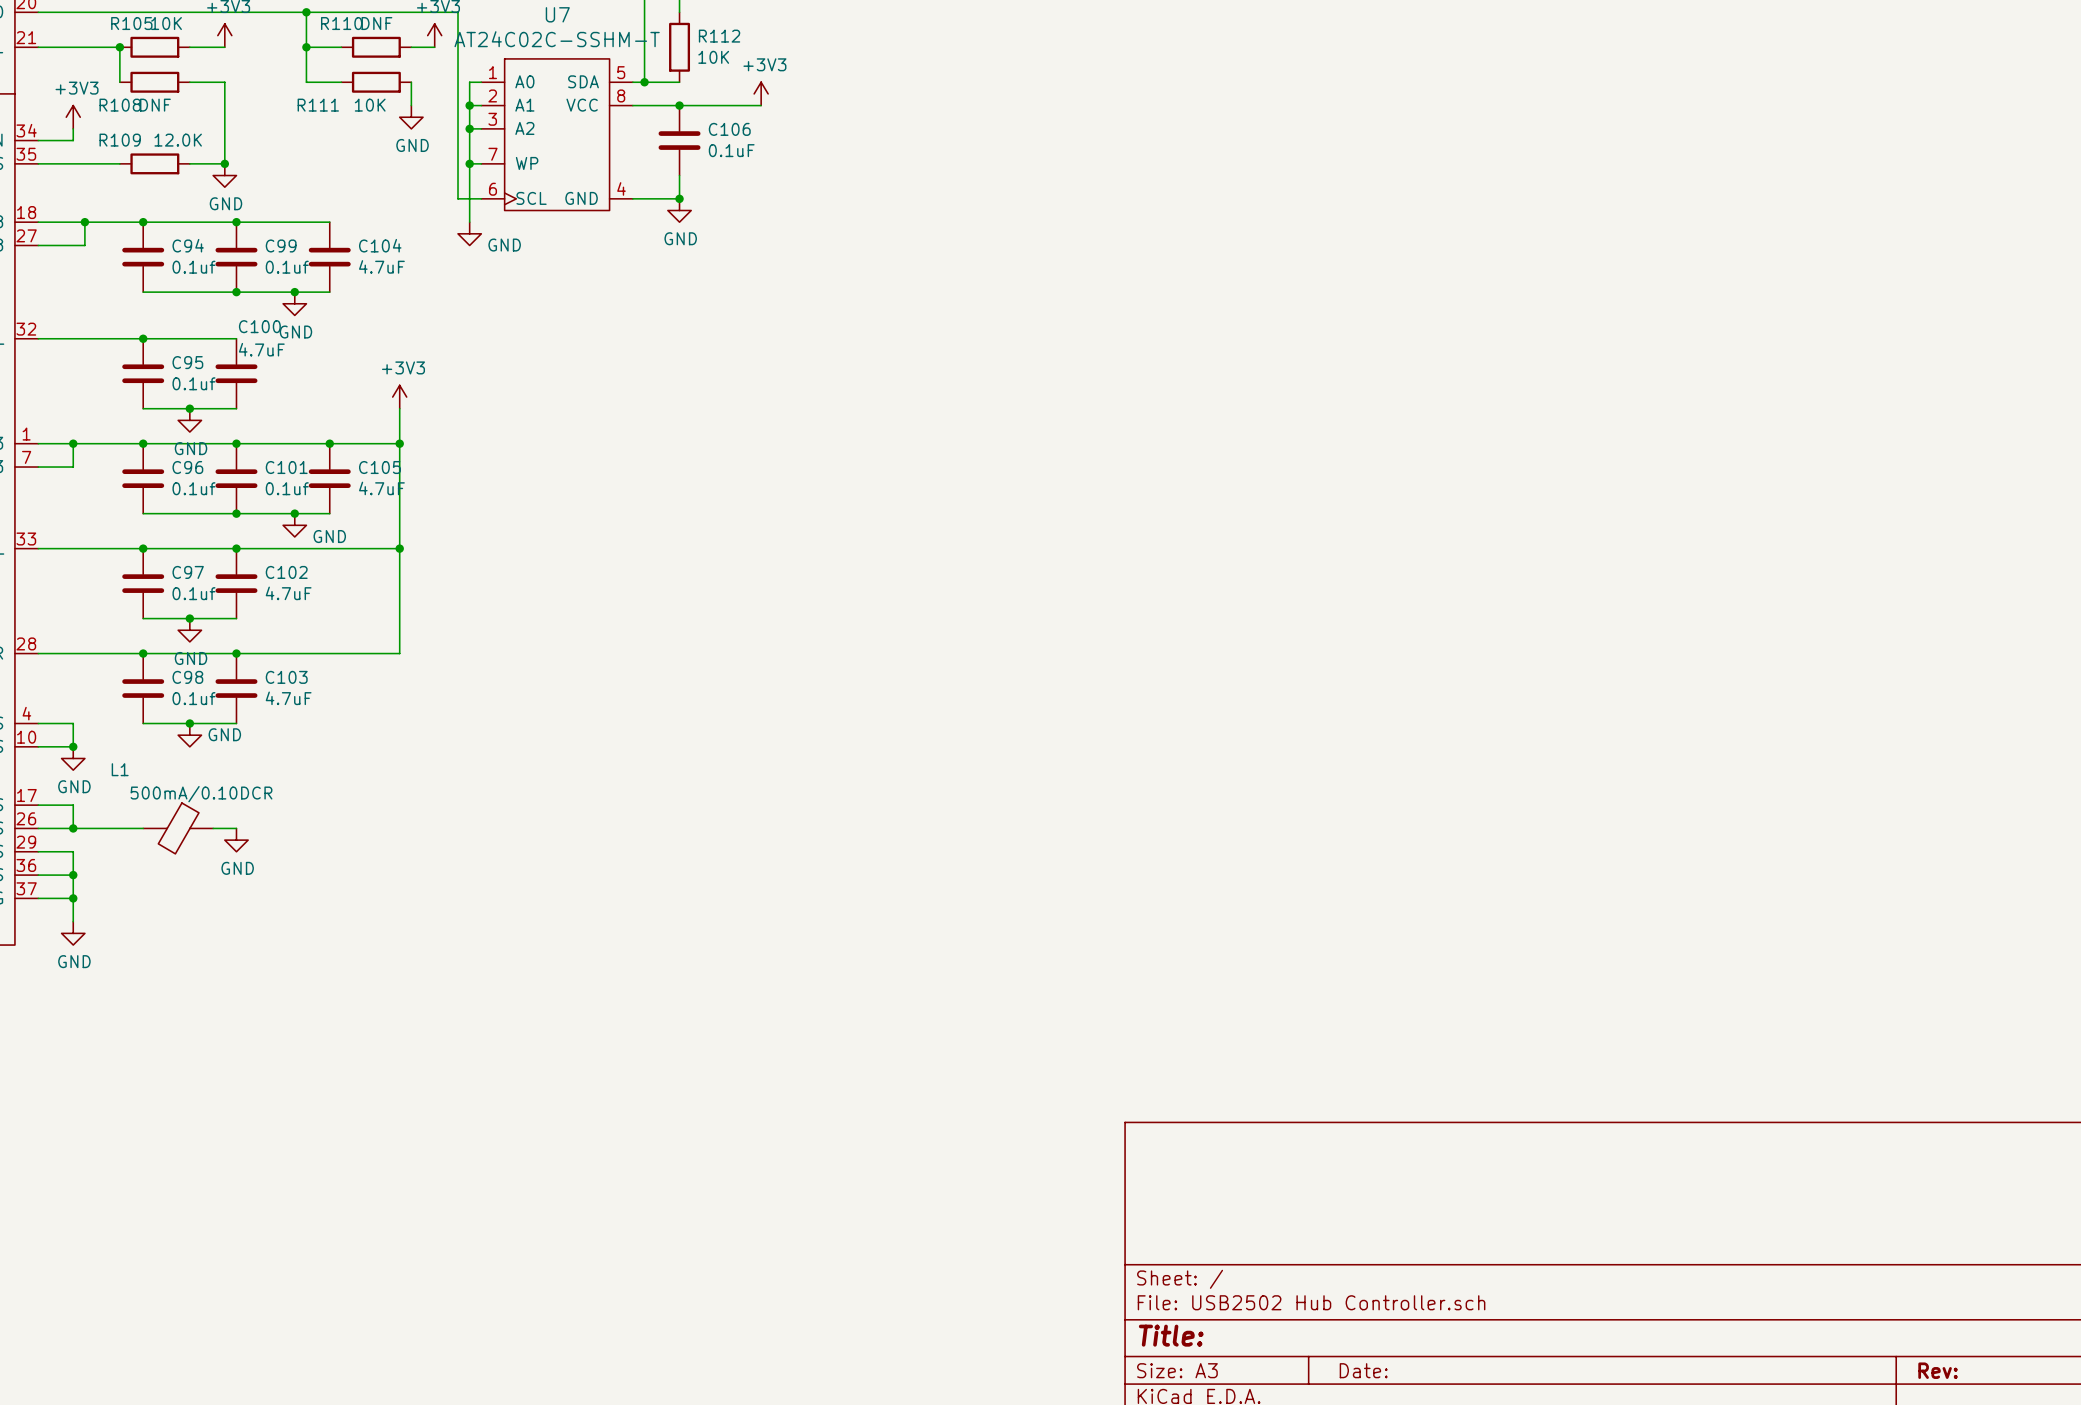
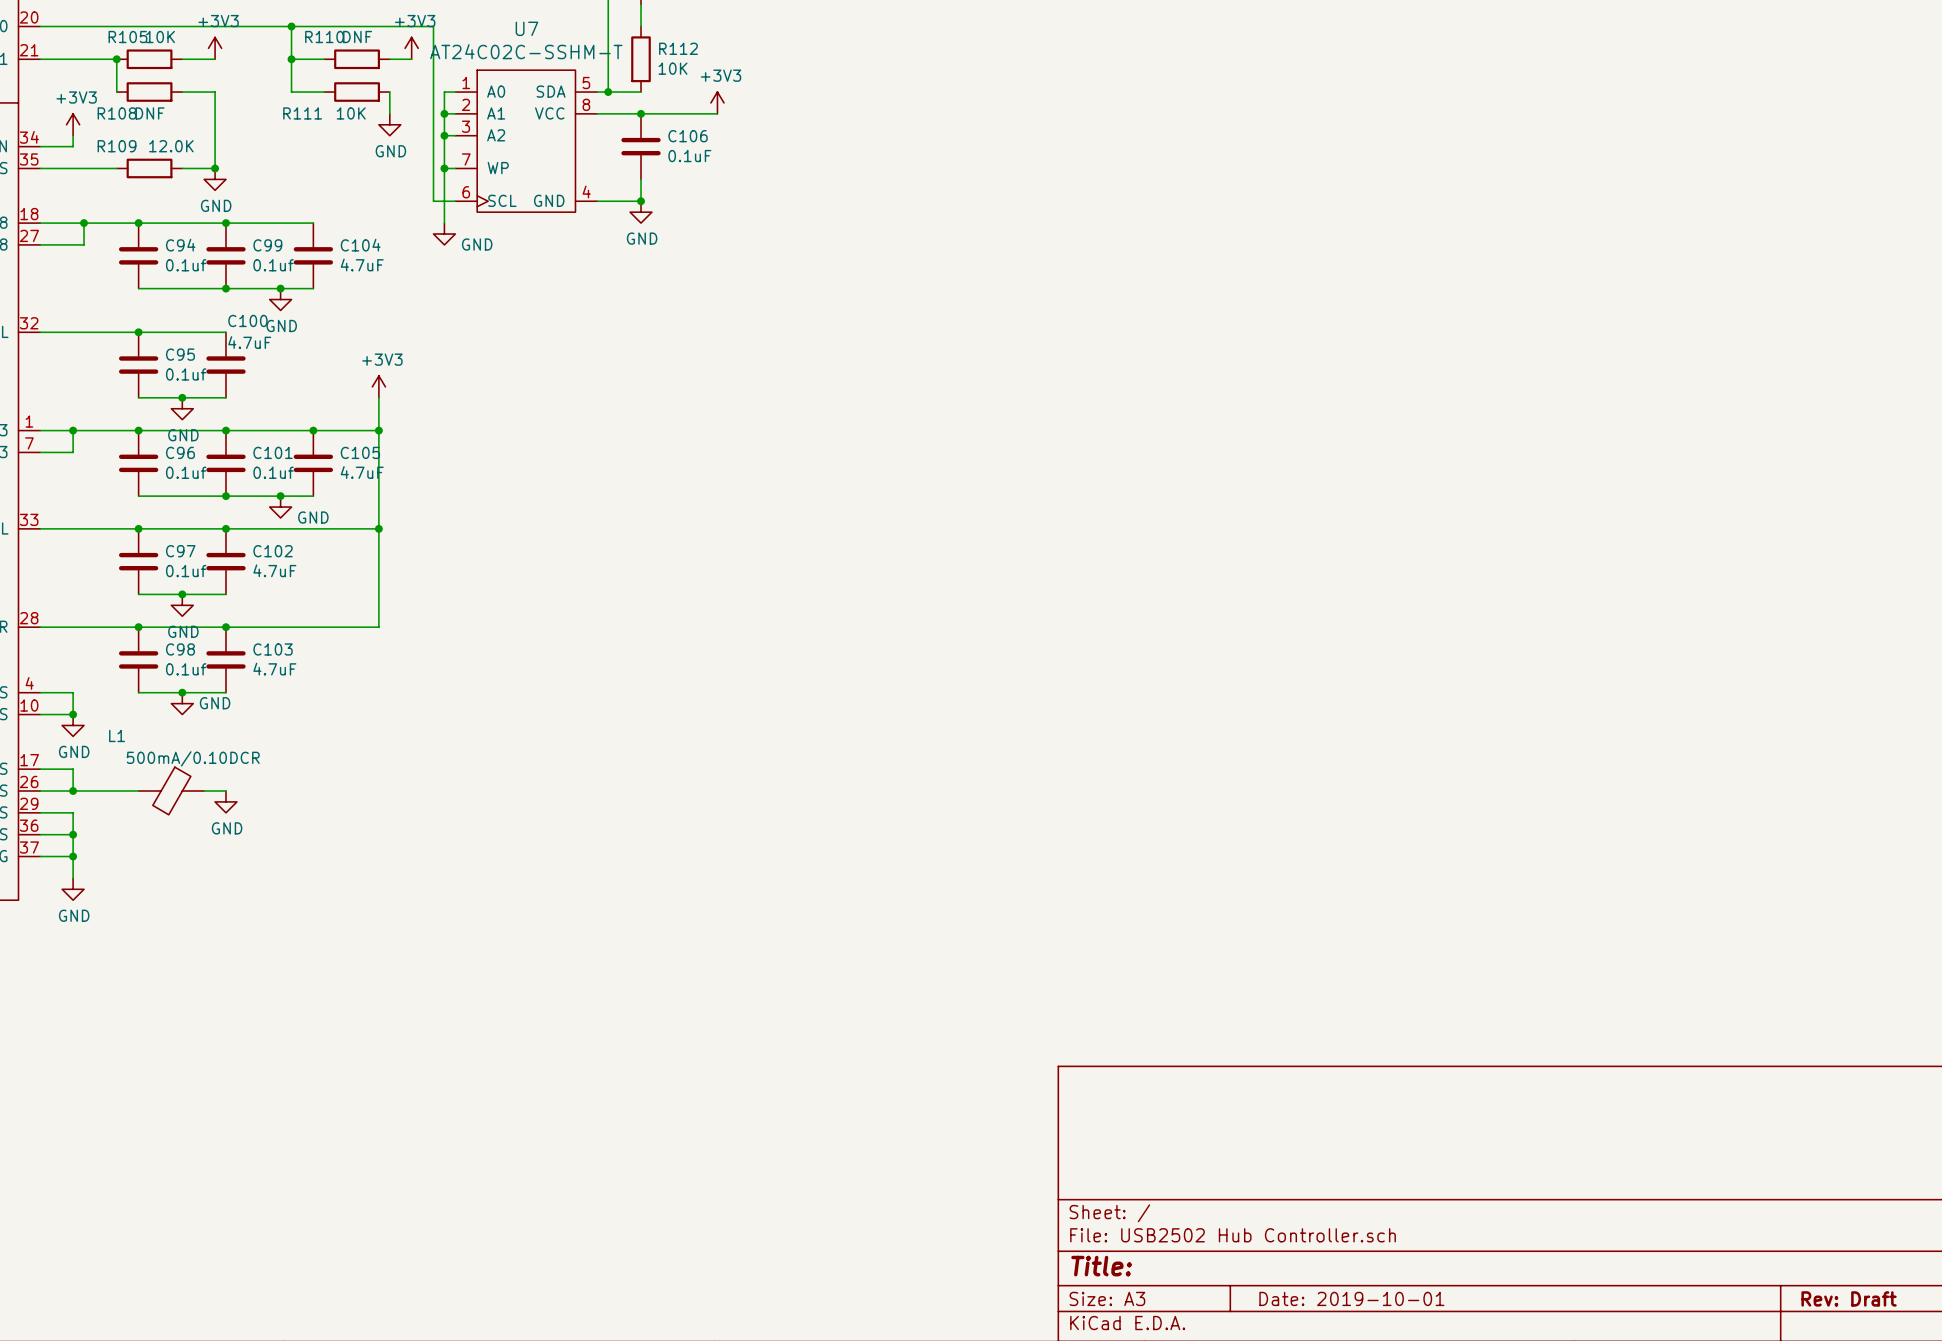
title block: Date: (1363, 1370) -> Date: 2019-10-01 (1351, 1298)
title block: Rev: (1938, 1370) -> Rev: Draft (1849, 1298)

